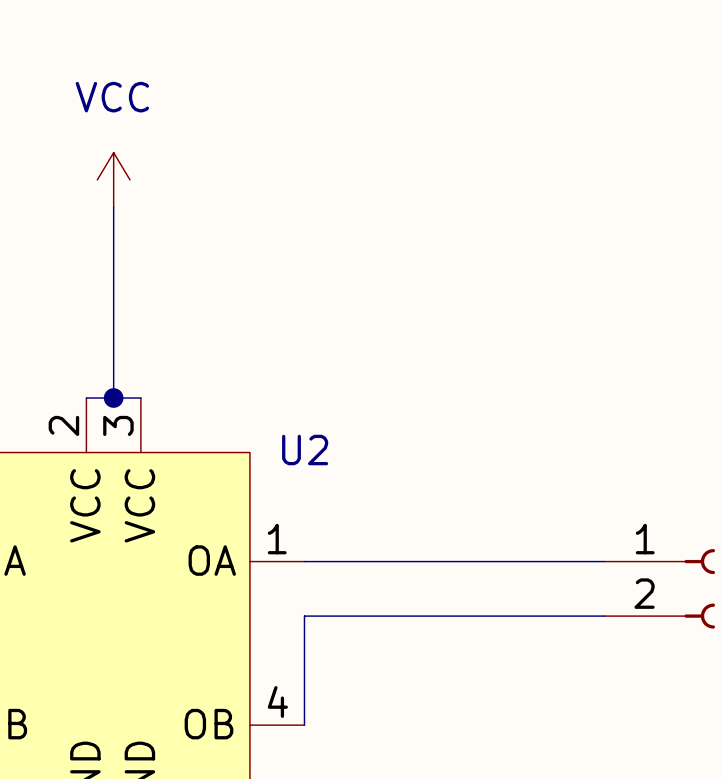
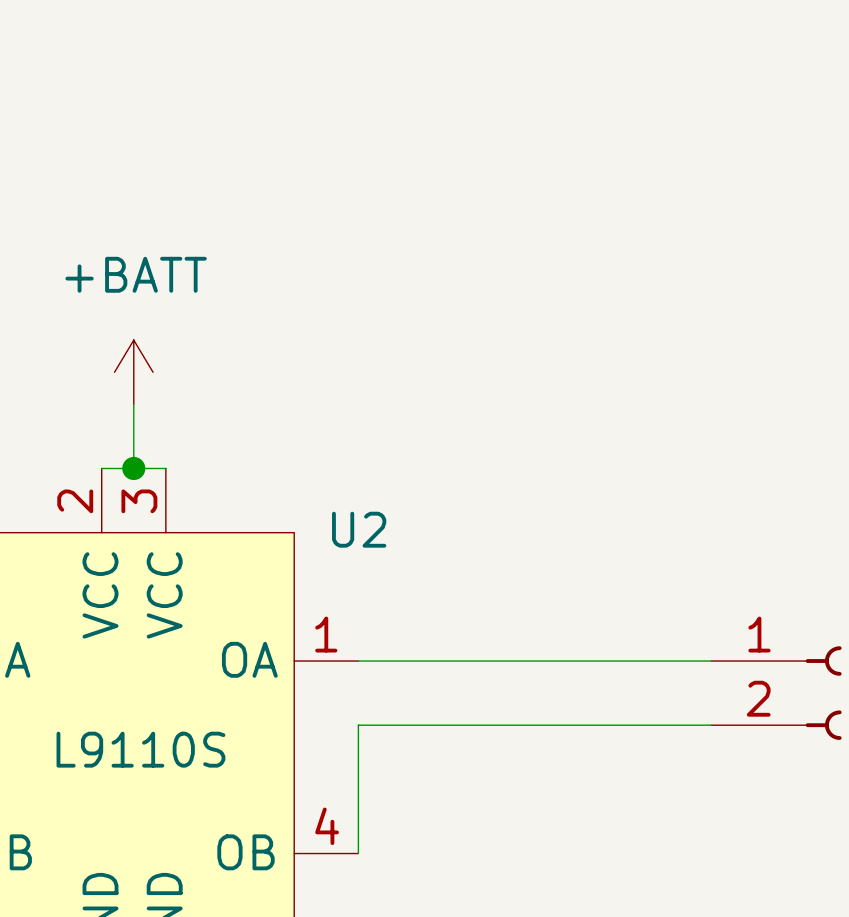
power symbol: VCC (113, 179) -> none
wire: (113, 207) (113, 343) -> none
power symbol: none -> +BATT (133, 372)
U2 value: none -> L9110S (140, 749)

